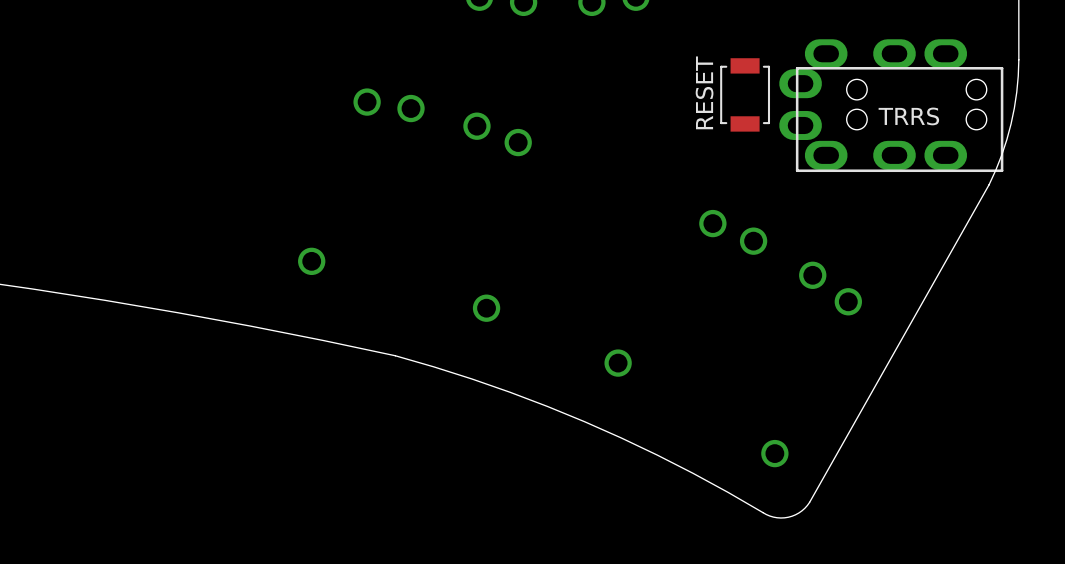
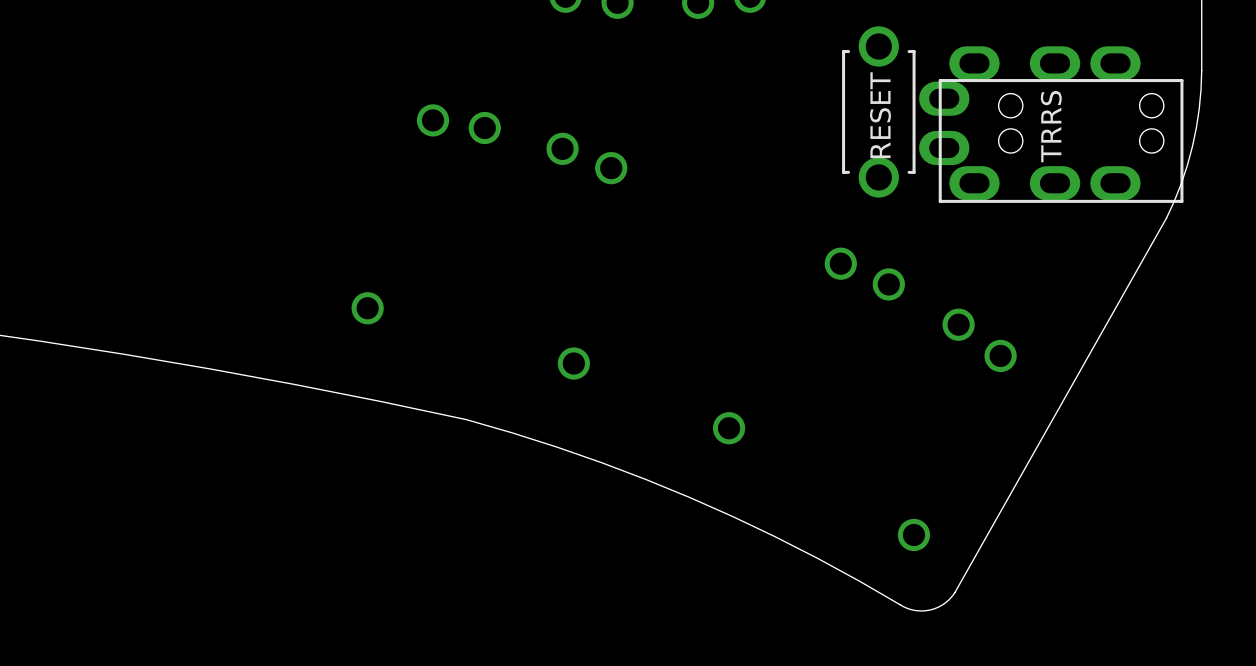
part footprint: [720, 58, 771, 132] -> [842, 26, 916, 198]
part text rotation: 0° (908, 116) -> 90° counterclockwise (1051, 126)

